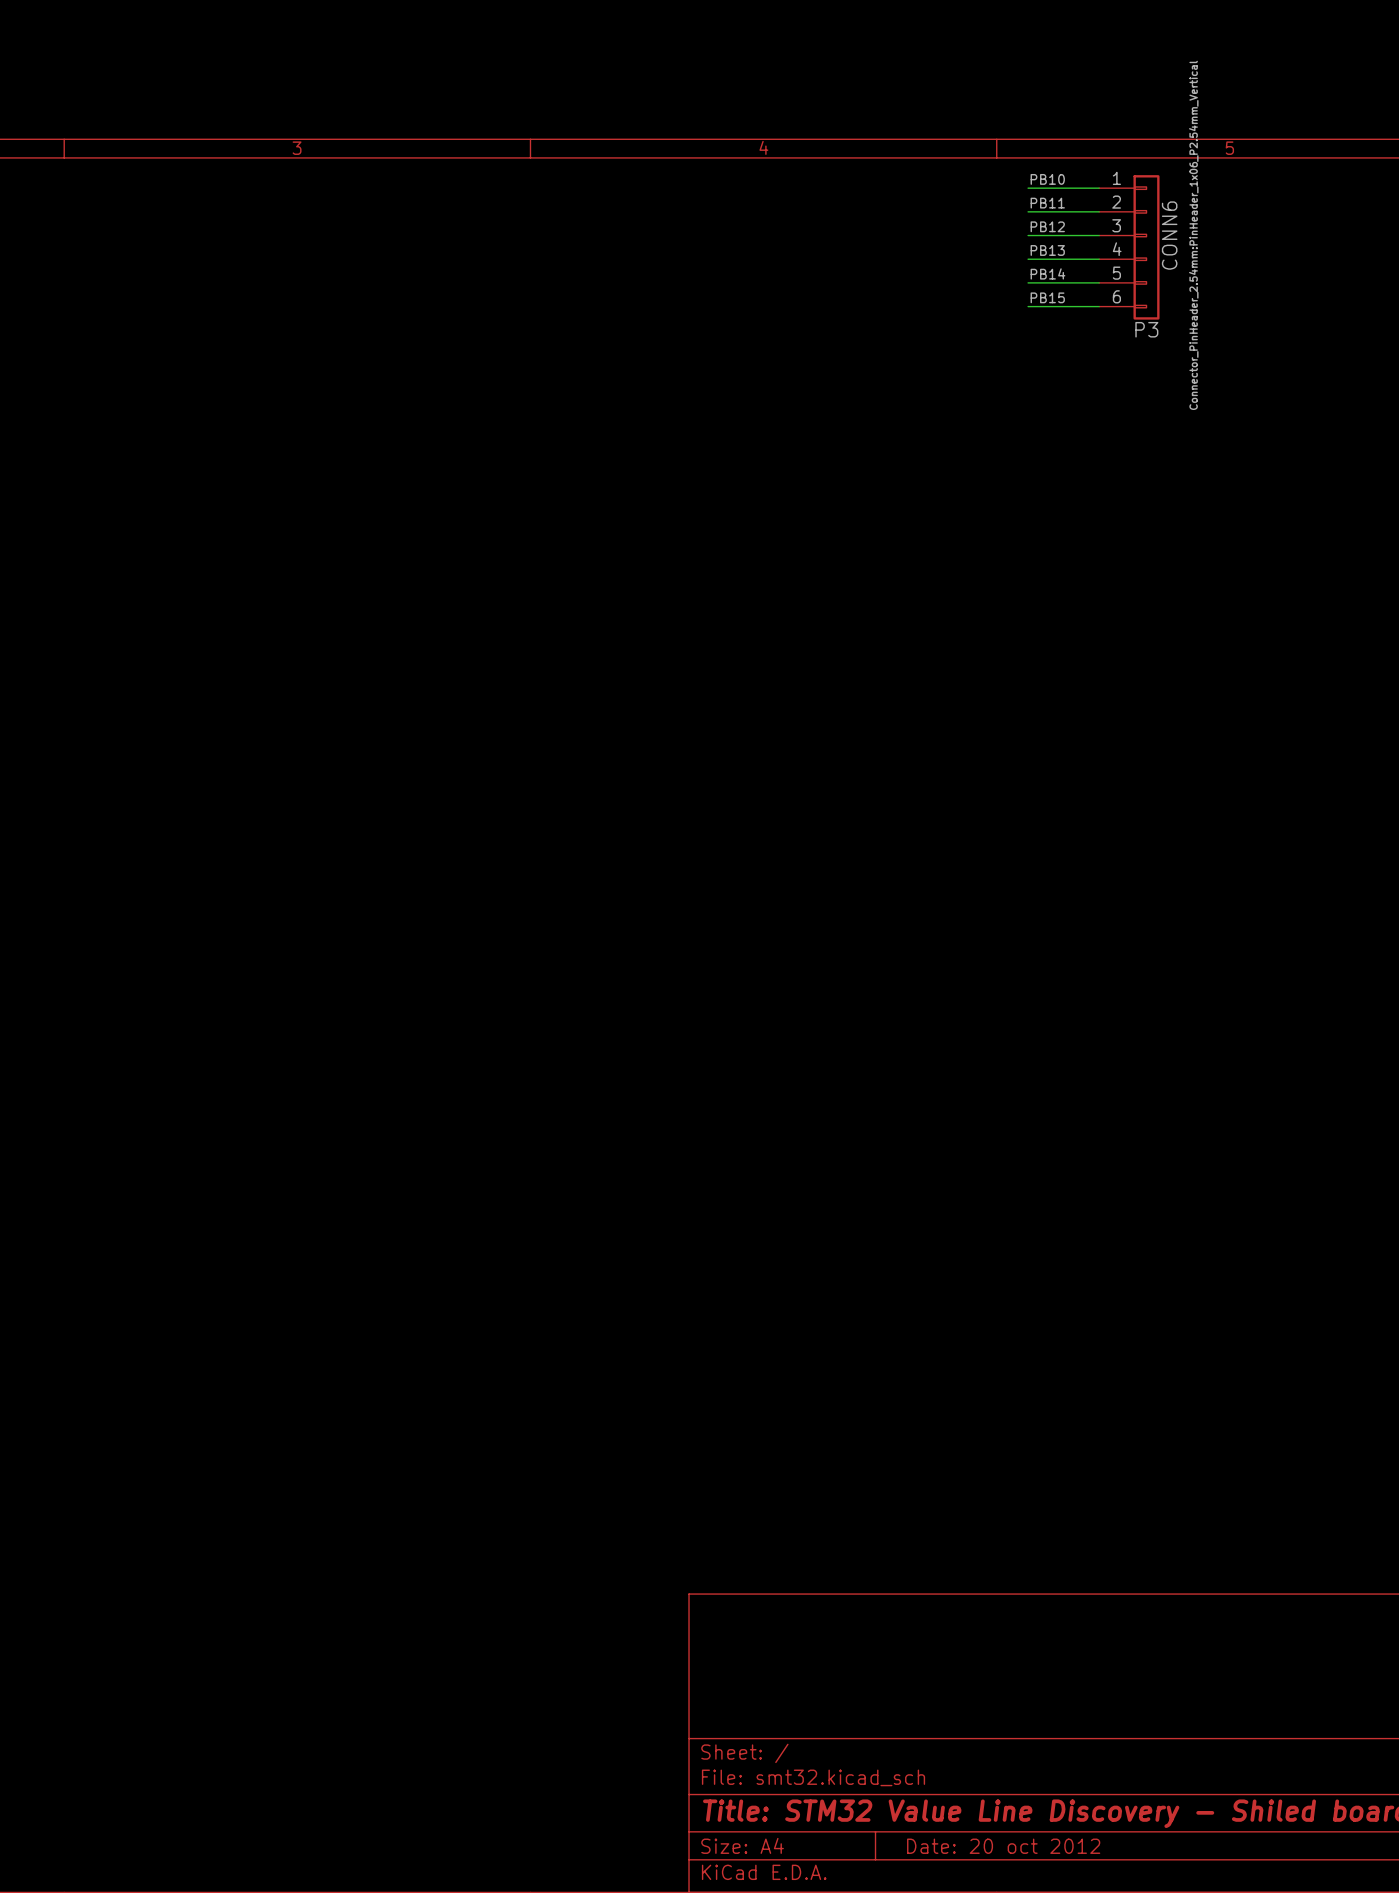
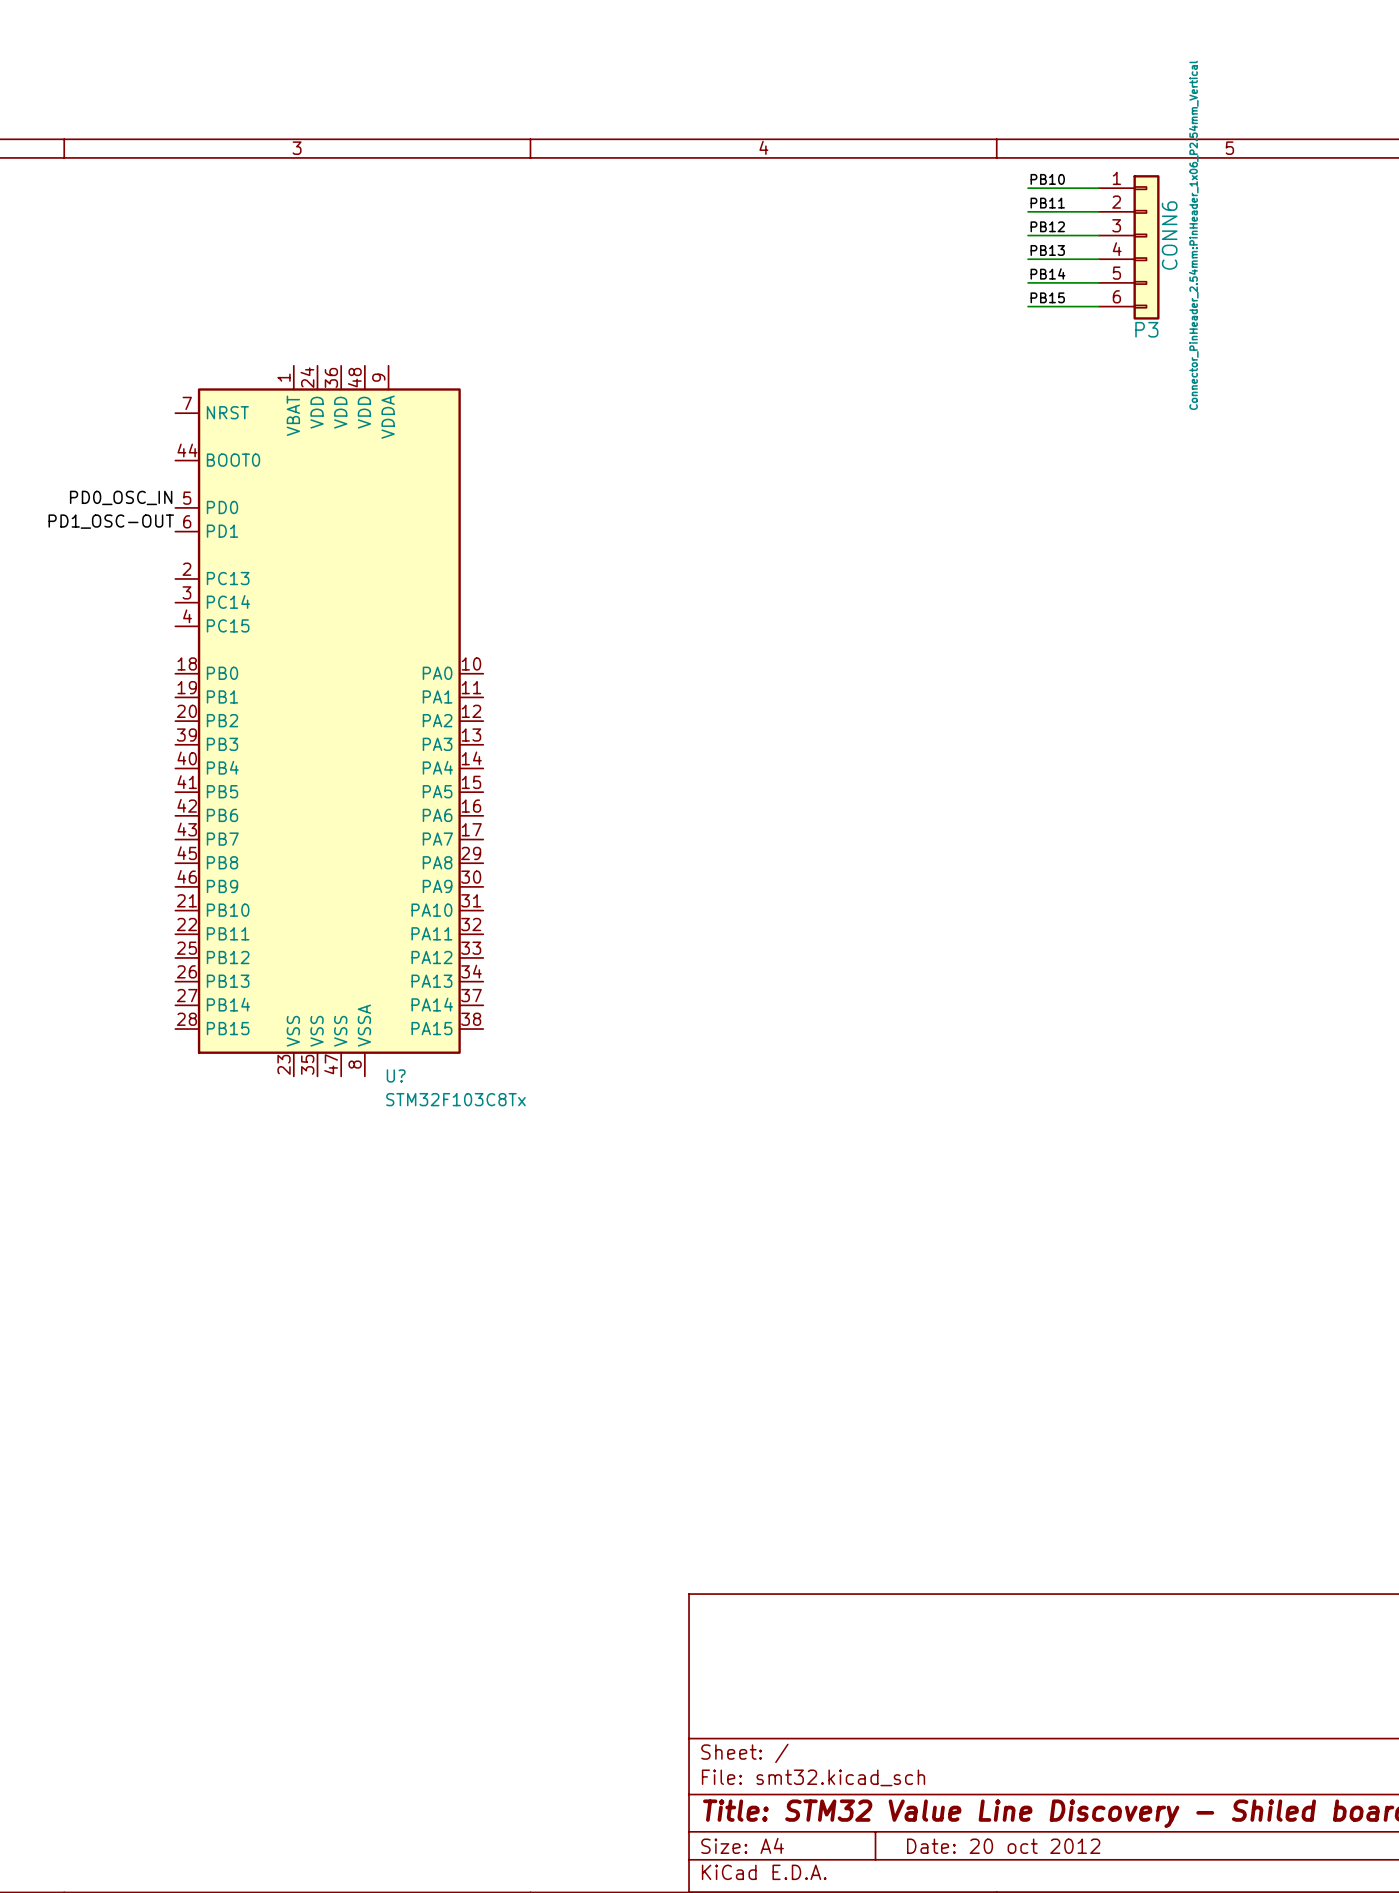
label: none -> PD0_OSC_IN (121, 497)
label: none -> PD1_OSC-OUT (111, 521)
U?: none -> STM32F103C8Tx (329, 721)

